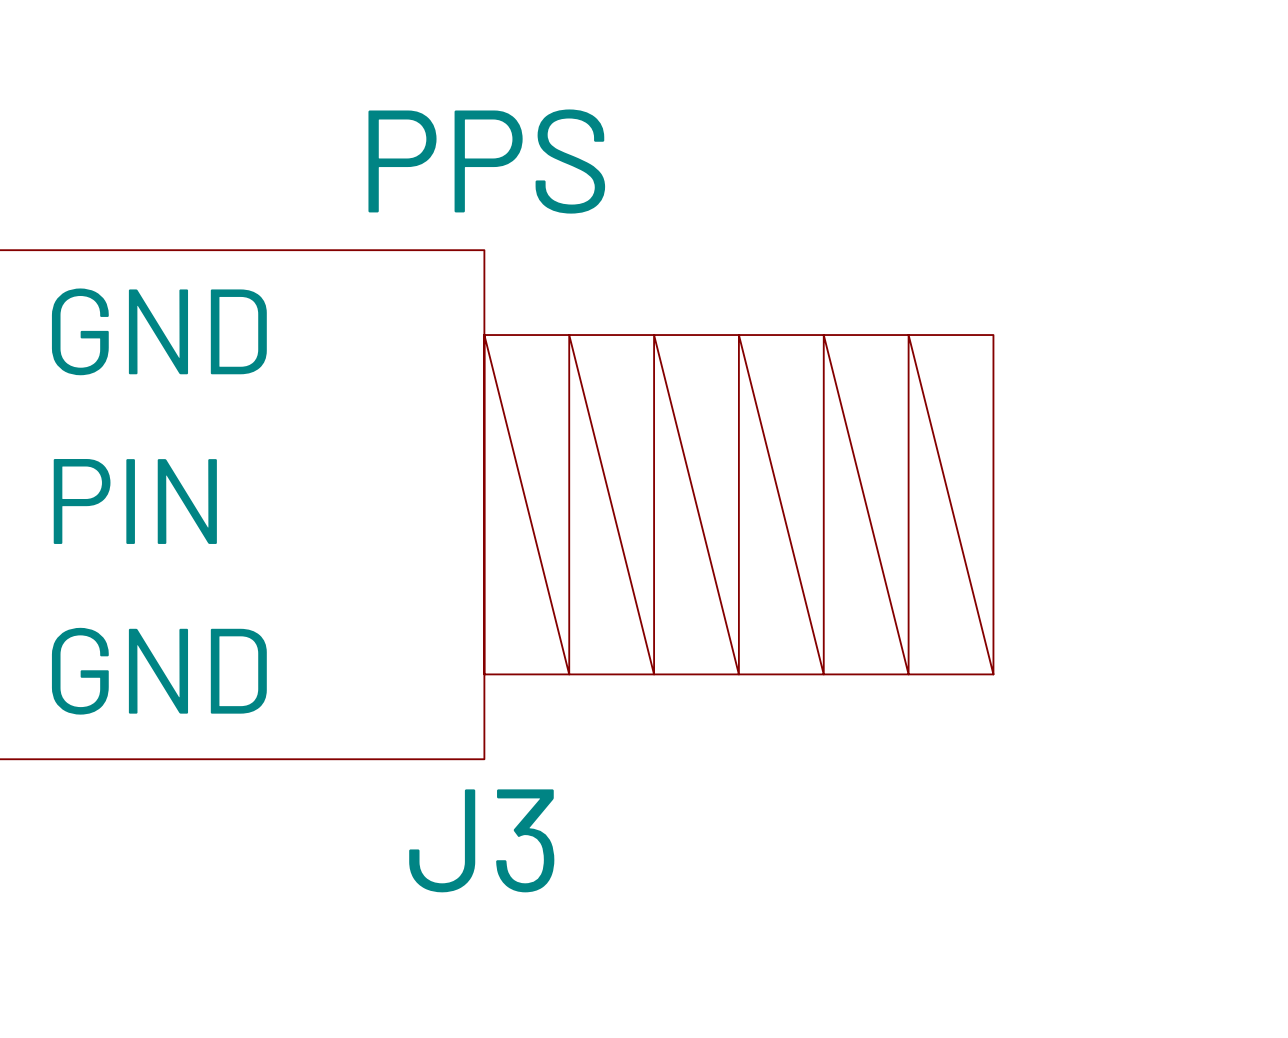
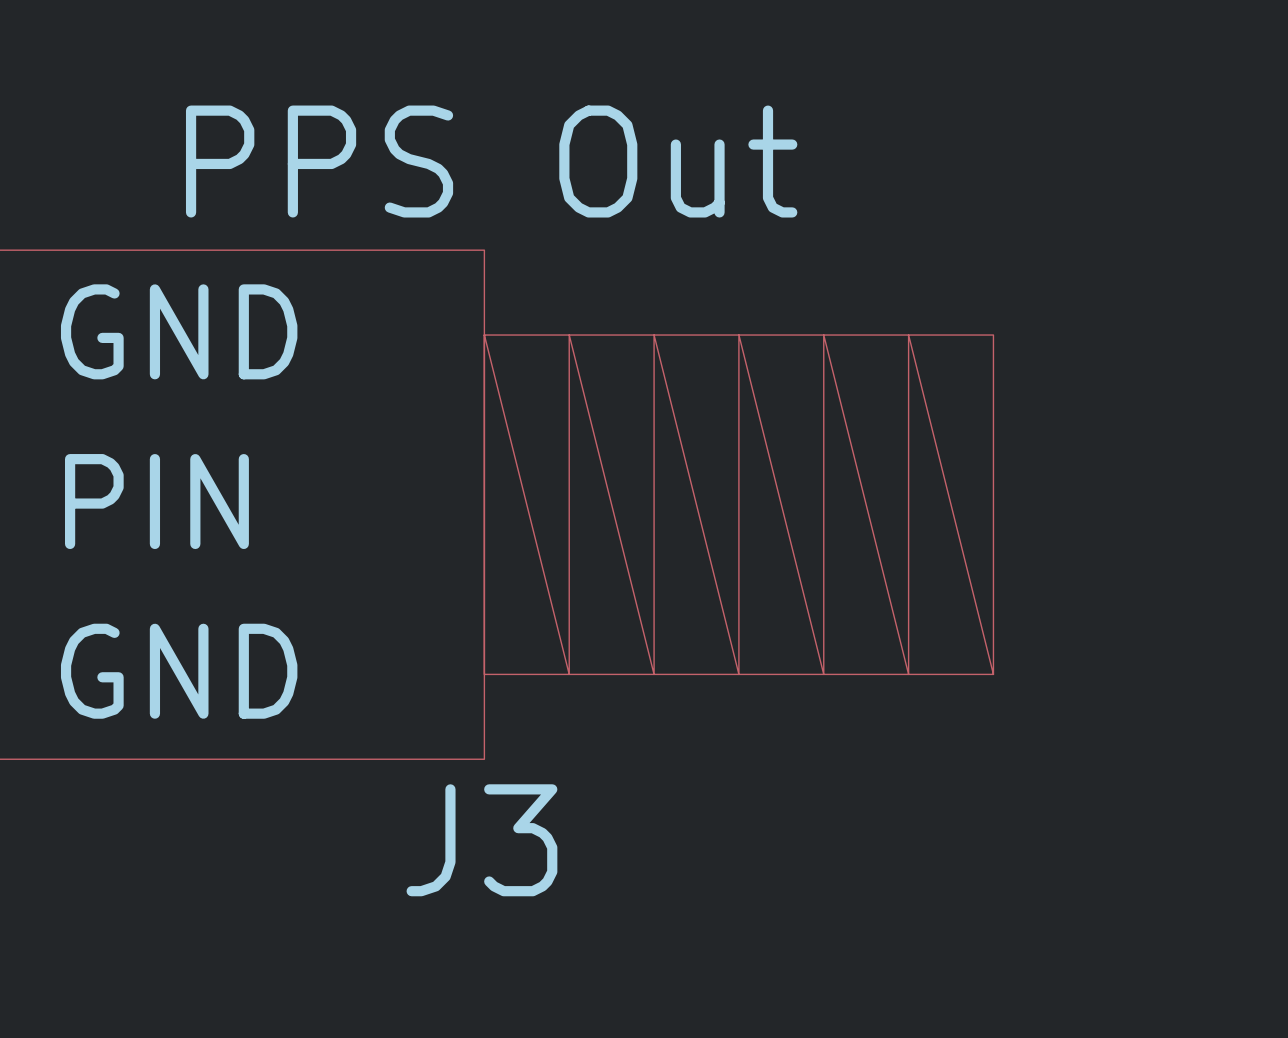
J3 value: PPS (486, 161) -> PPS Out (491, 161)

